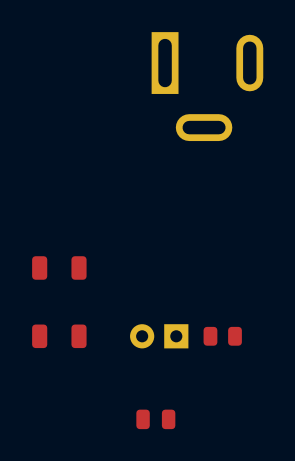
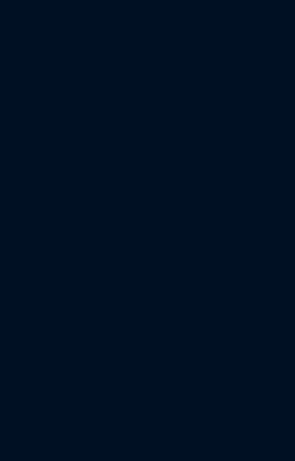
part: (207, 86) -> none
part: (59, 267) -> none
part: (59, 336) -> none
part: (159, 336) -> none
part: (222, 336) -> none
part: (155, 419) -> none

